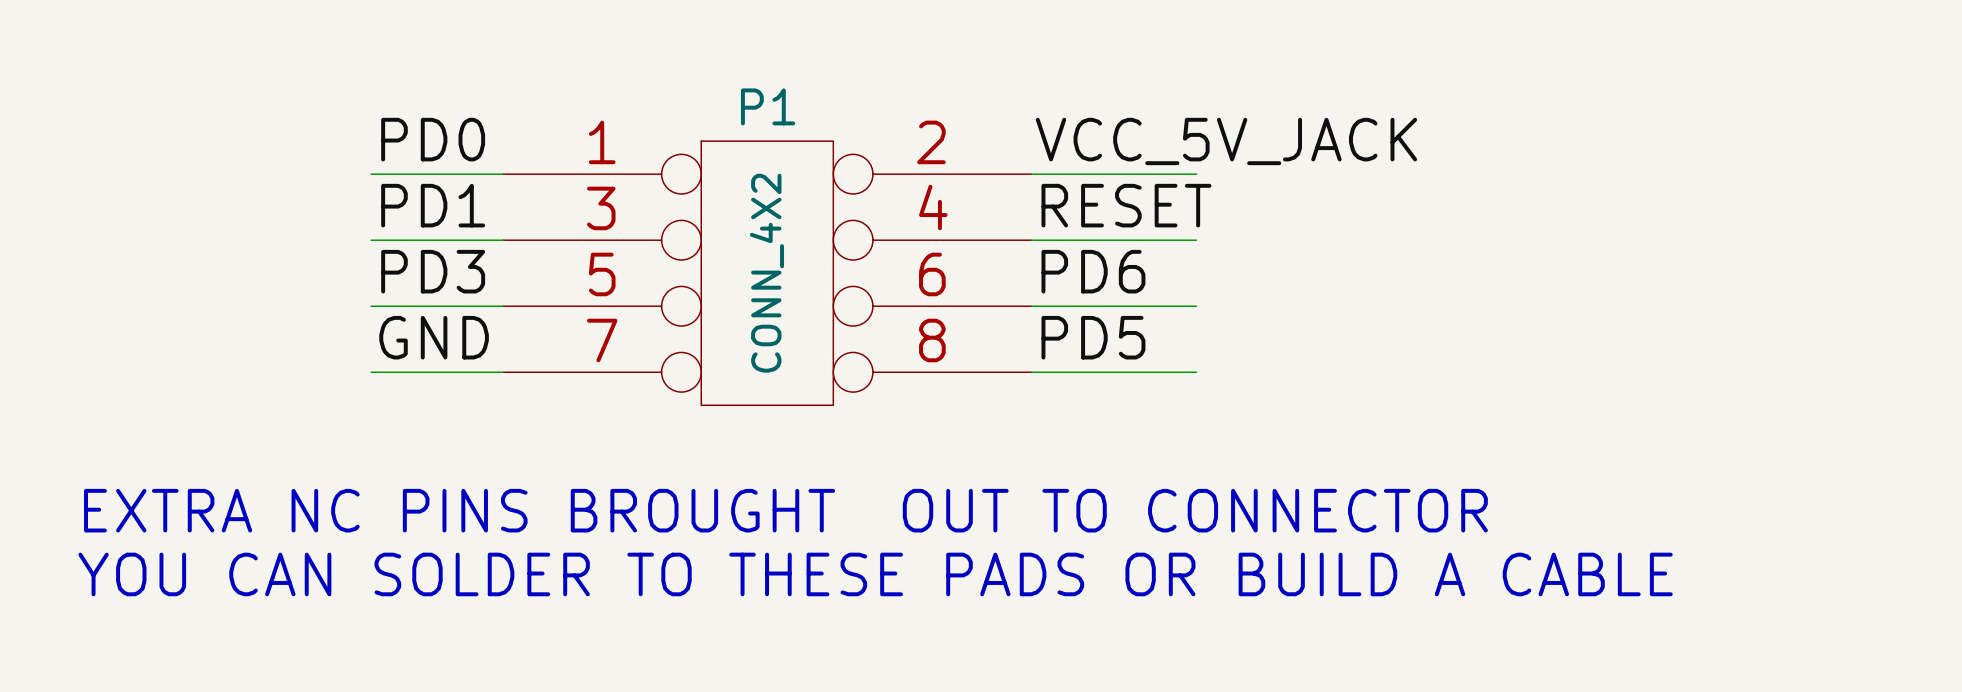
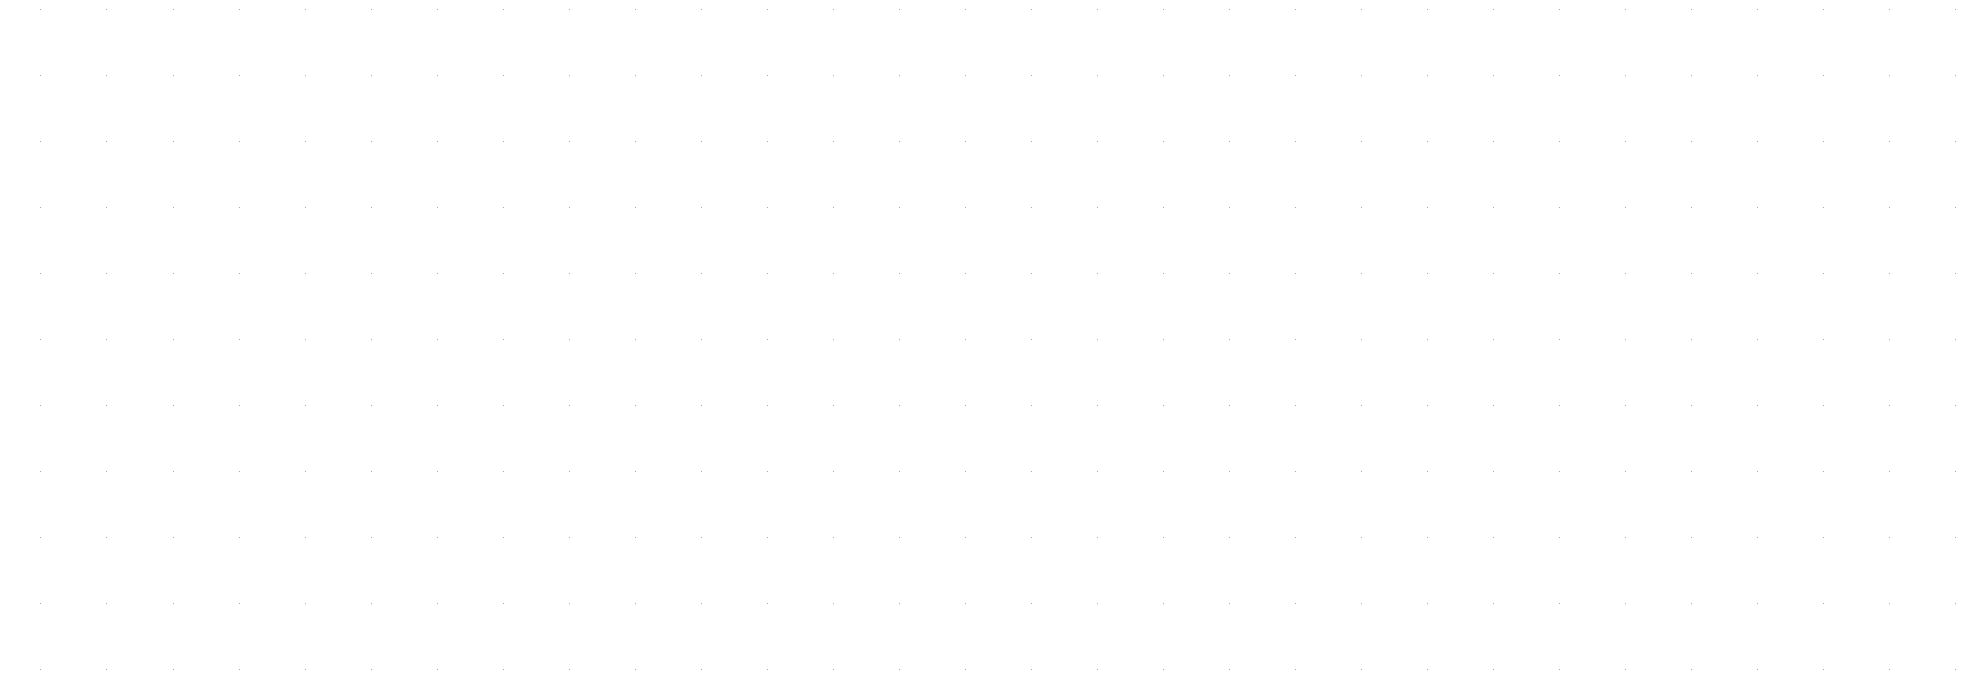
label: PD0 (433, 139) -> none
label: VCC_5V_JACK (1226, 141) -> none
wire: (371, 174) (503, 174) -> none
wire: (1031, 174) (1196, 174) -> none
label: PD1 (433, 205) -> none
label: RESET (1126, 205) -> none
wire: (371, 240) (503, 240) -> none
wire: (1031, 240) (1196, 240) -> none
label: PD3 (433, 271) -> none
label: PD6 (1093, 271) -> none
P1: CONN_4X2 (767, 273) -> none
wire: (371, 306) (503, 306) -> none
wire: (1031, 306) (1196, 306) -> none
label: GND (434, 337) -> none
label: PD5 (1093, 337) -> none
wire: (371, 372) (503, 372) -> none
wire: (1031, 372) (1196, 372) -> none
text: EXTRA NC PINS BROUGHT OUT TO CONNECTOR (785, 510) -> none
text: YOU CAN SOLDER TO THESE PADS OR BUILD A CABLE (875, 574) -> none

